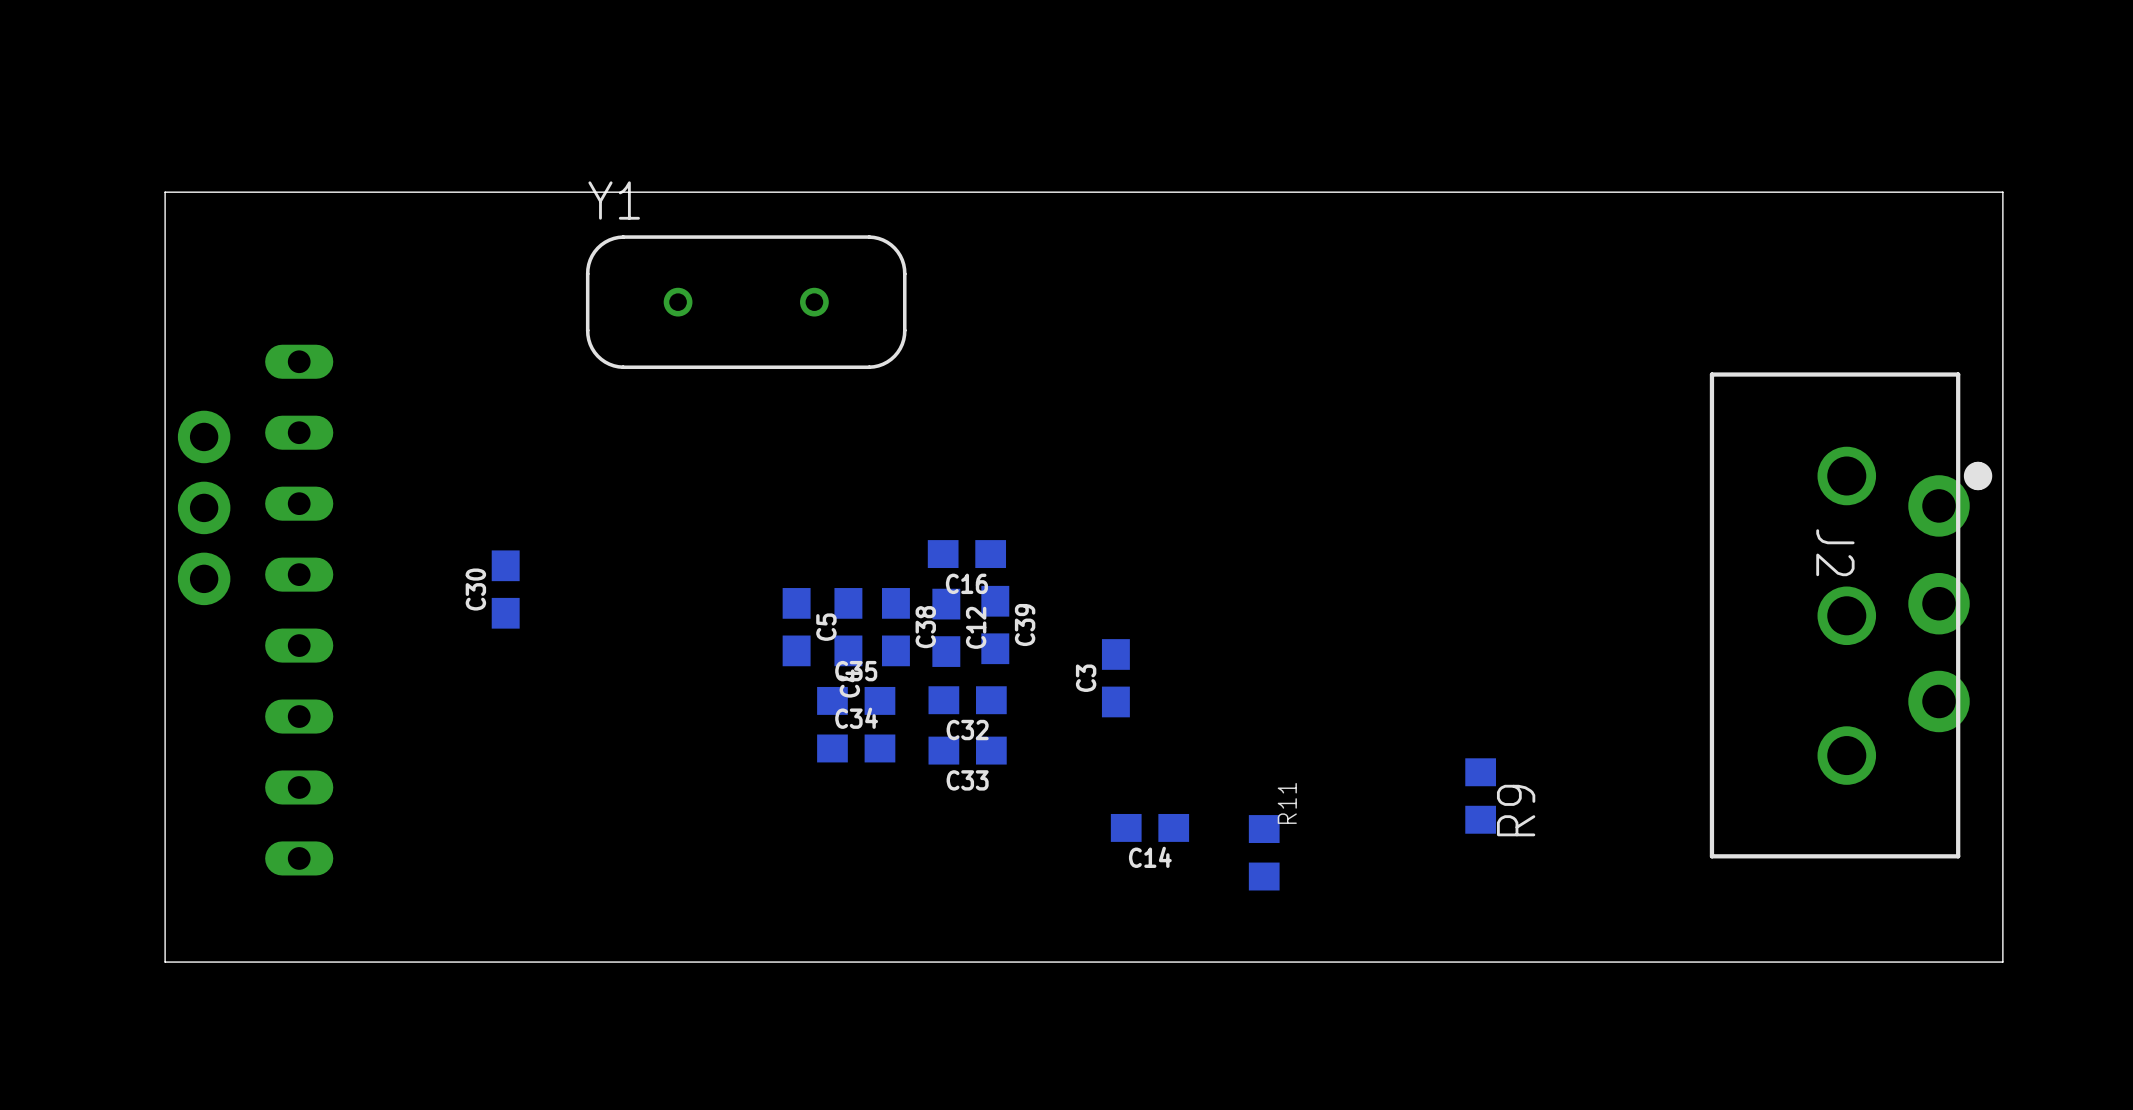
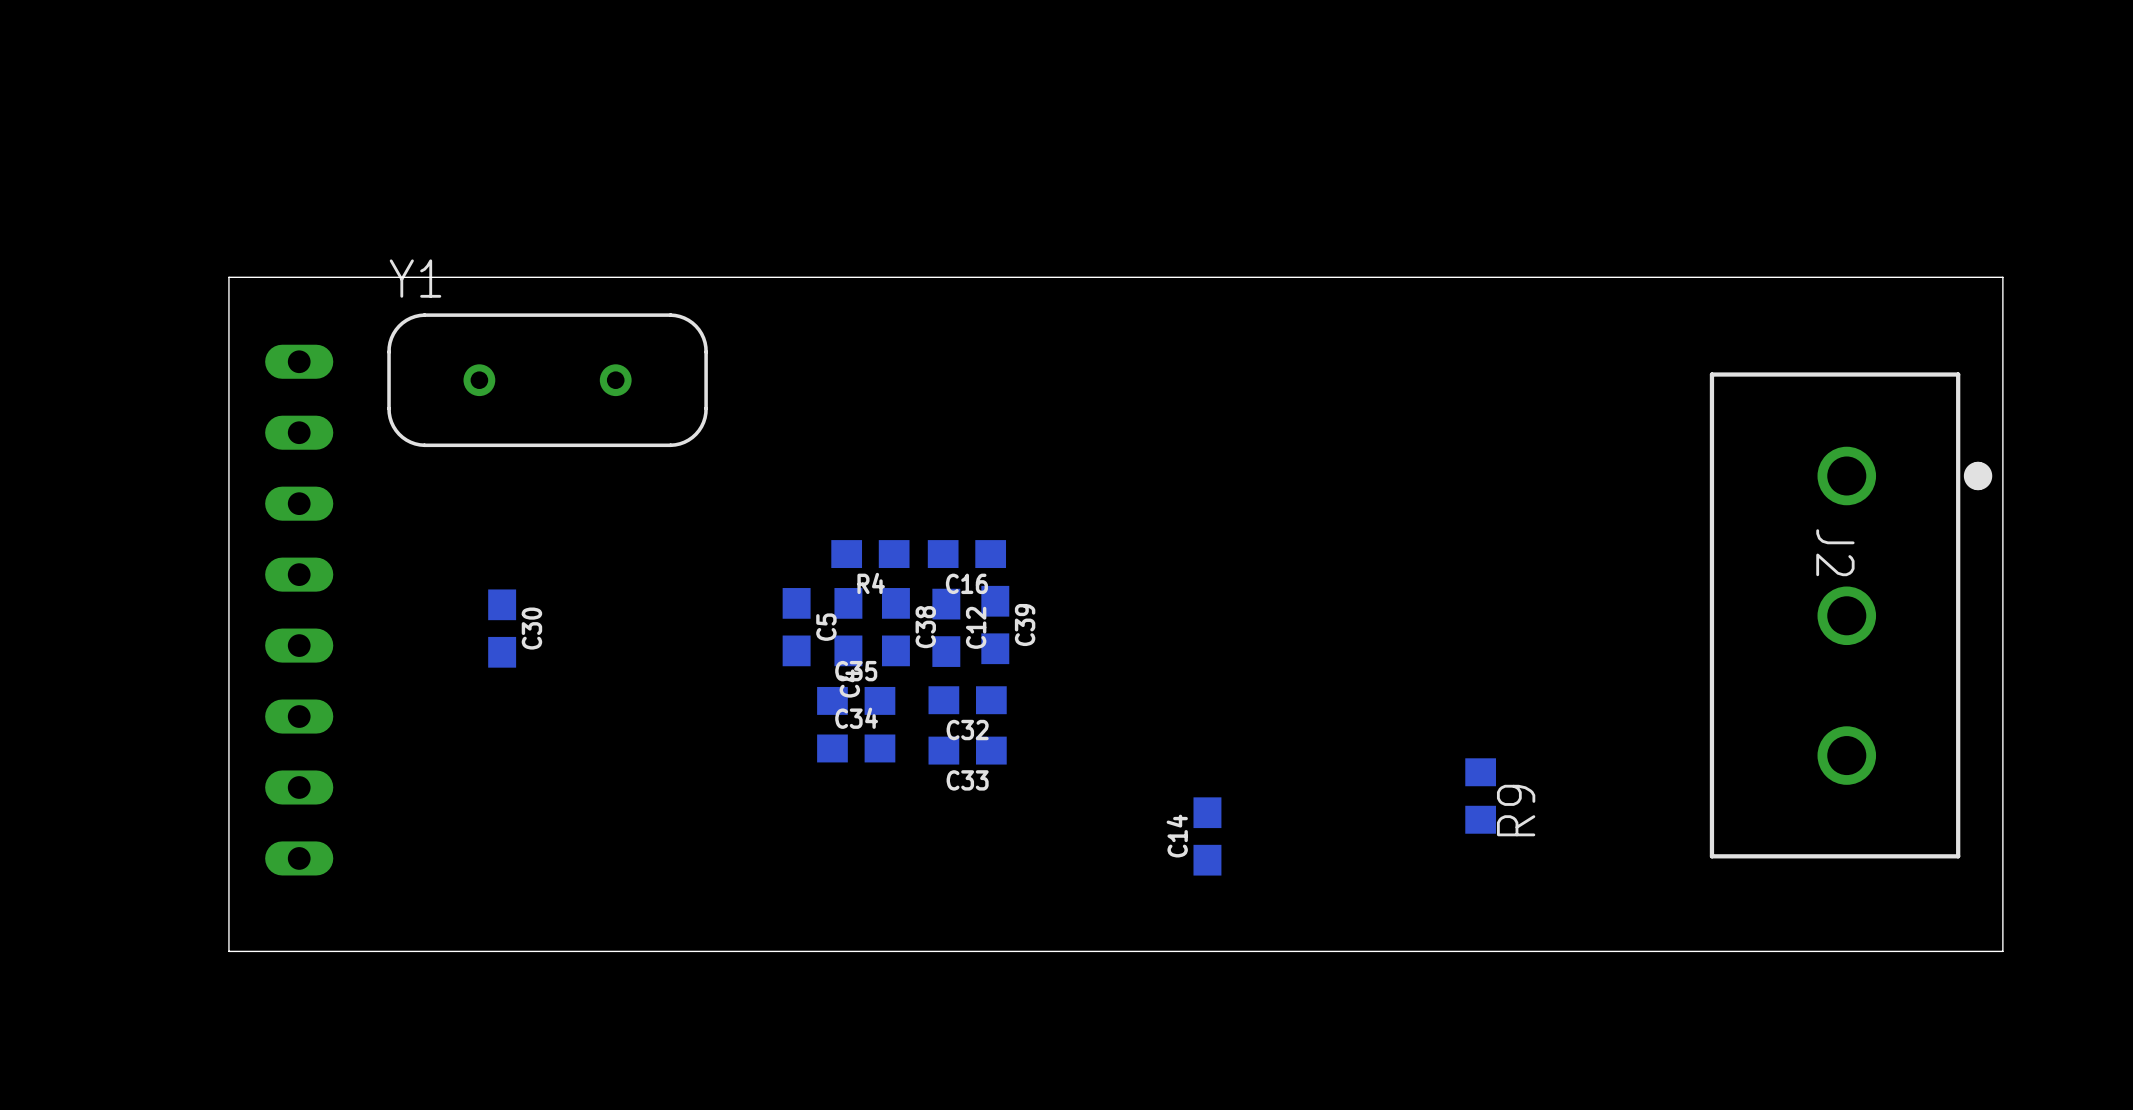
Y1 footprint: [585, 235, 907, 370] -> [387, 313, 708, 448]
board edge: (2002, 277) (2002, 192) (165, 192) (165, 962) (2002, 962) (2002, 951) -> (2002, 277) (228, 277) (228, 951) (2002, 951)
part: (204, 507) -> none
R4: none -> (870, 554)
C30 name position: C30 (475, 589) -> C30 (531, 628)
C30 position: (505, 589) -> (502, 628)
part: (1939, 603) -> none
C3: (1115, 678) -> none
C14 rotation: 0° (1149, 827) -> 90° clockwise (1207, 836)
C14 position: (1149, 827) -> (1207, 836)
R11: (1264, 852) -> none

